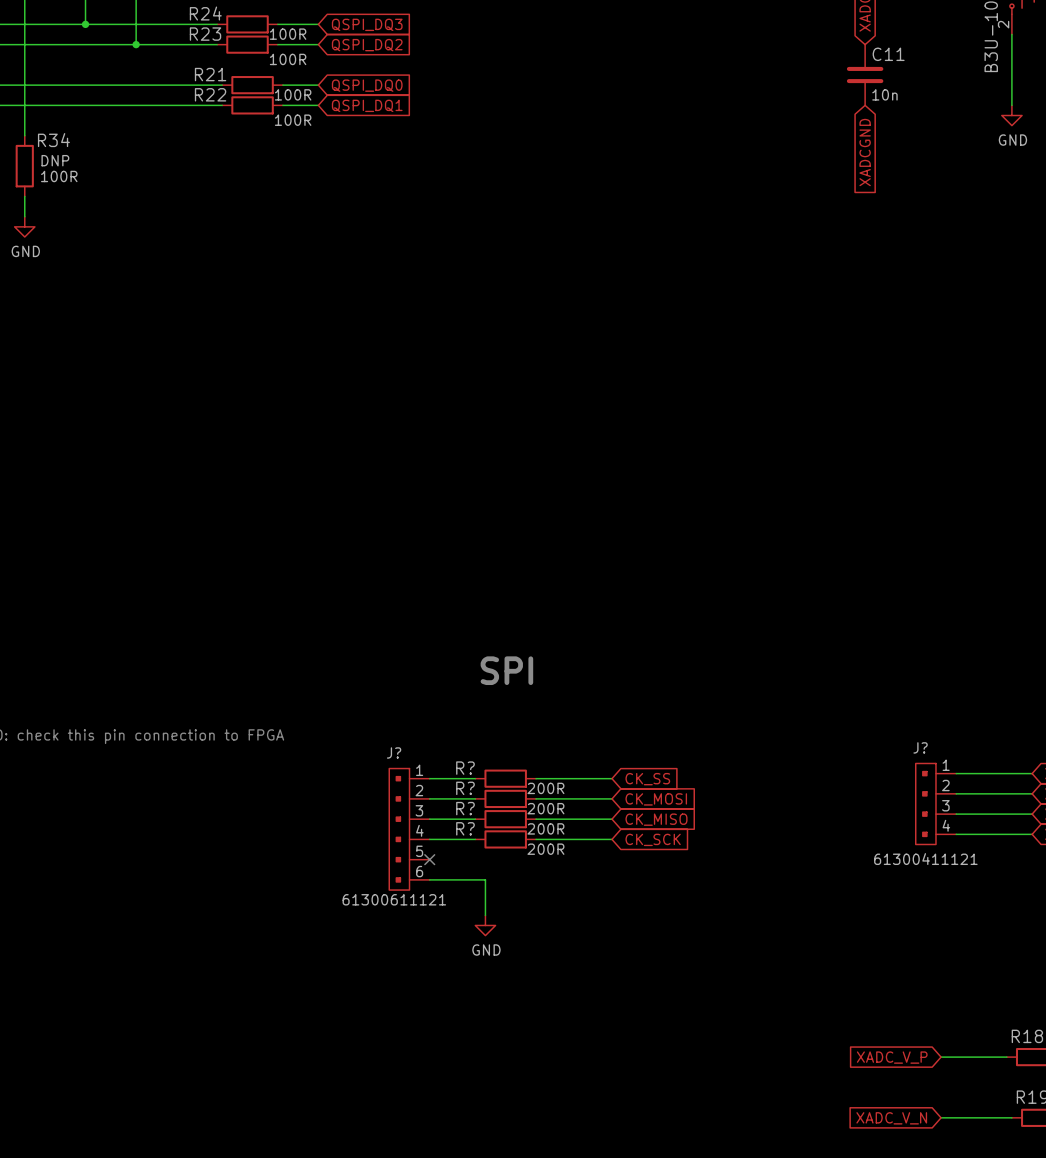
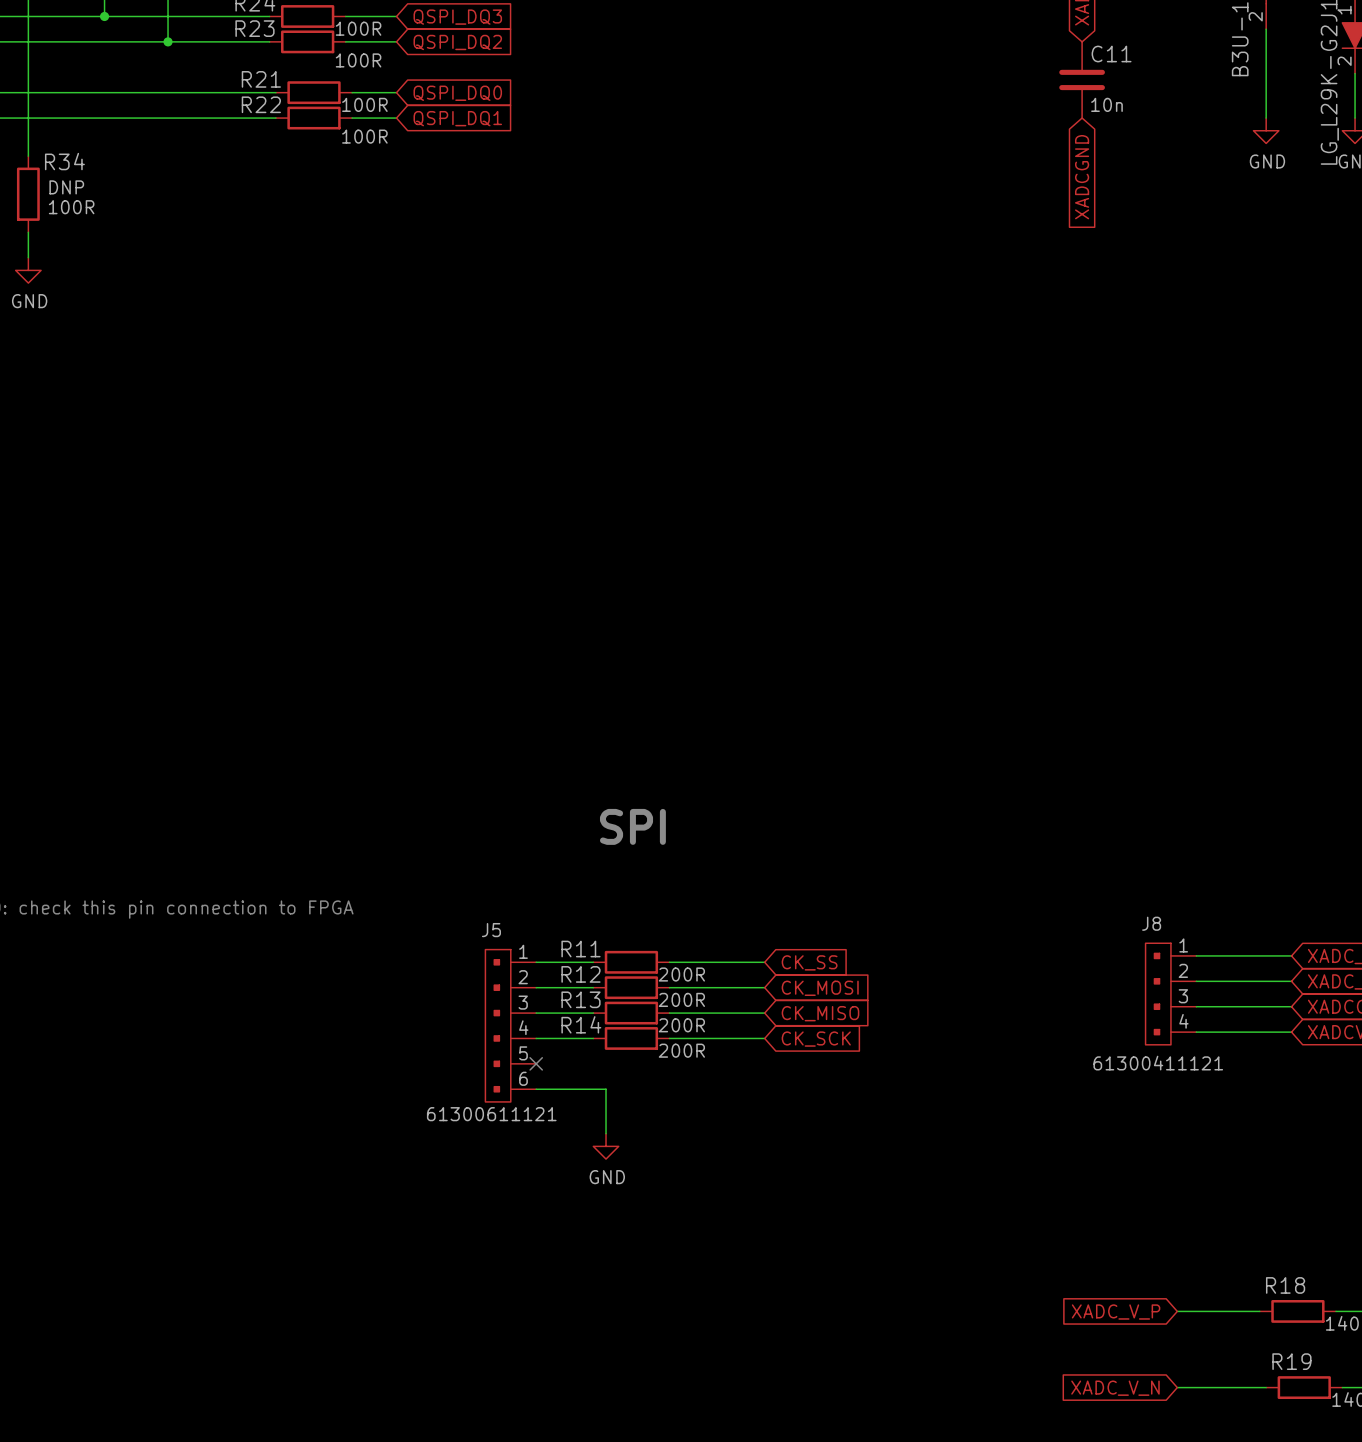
J? name: J? (920, 747) -> J8 (1151, 923)
J? name: J? (394, 752) -> J5 (491, 930)
R? name: R? (465, 768) -> R11 (580, 949)
R? name: R? (465, 788) -> R12 (580, 974)
R? name: R? (465, 808) -> R13 (580, 999)
R? name: R? (465, 828) -> R14 (581, 1024)

